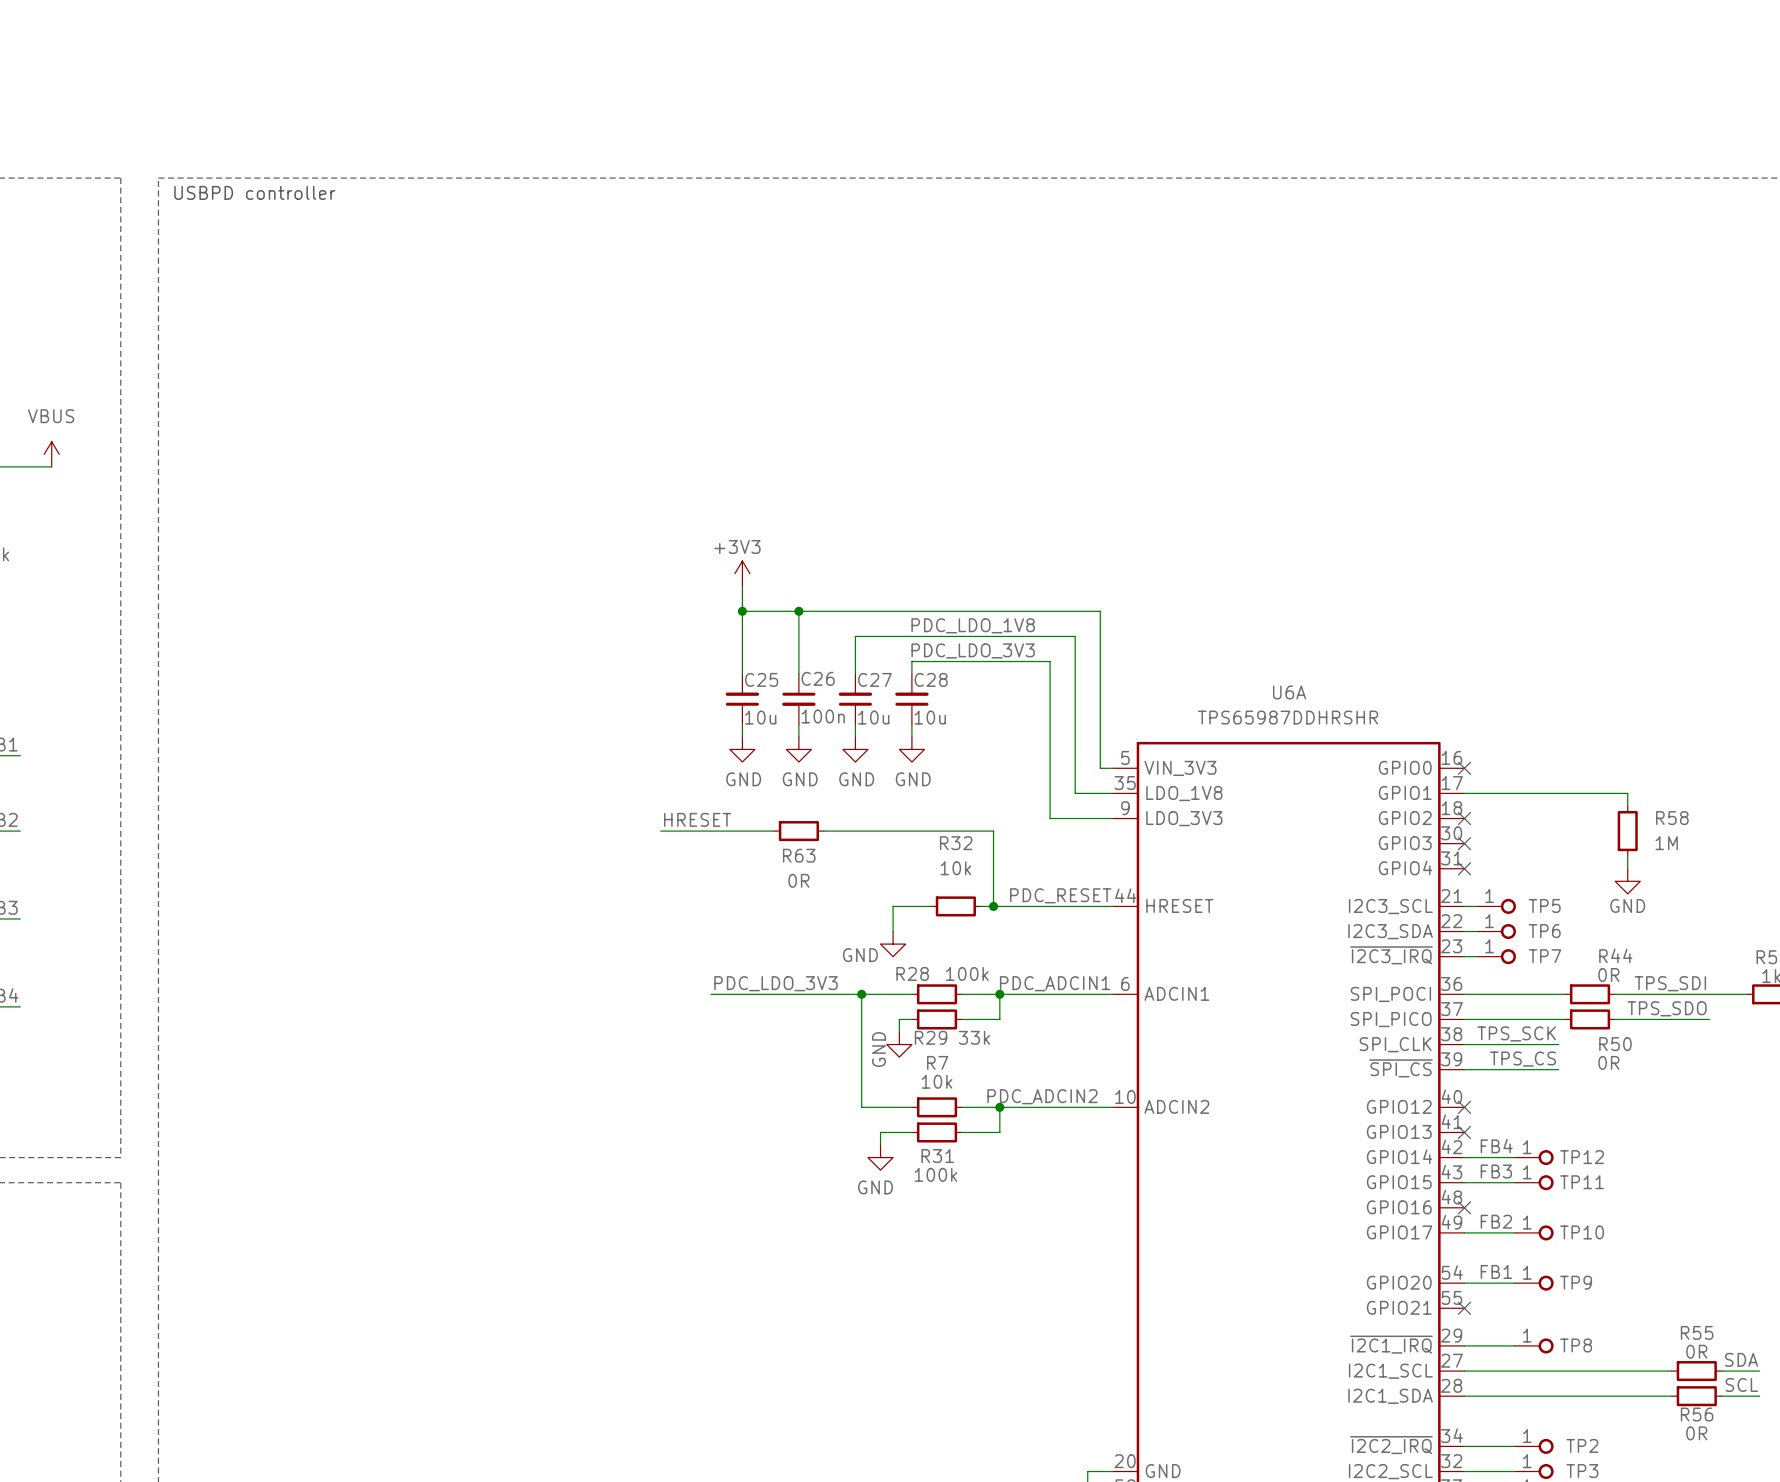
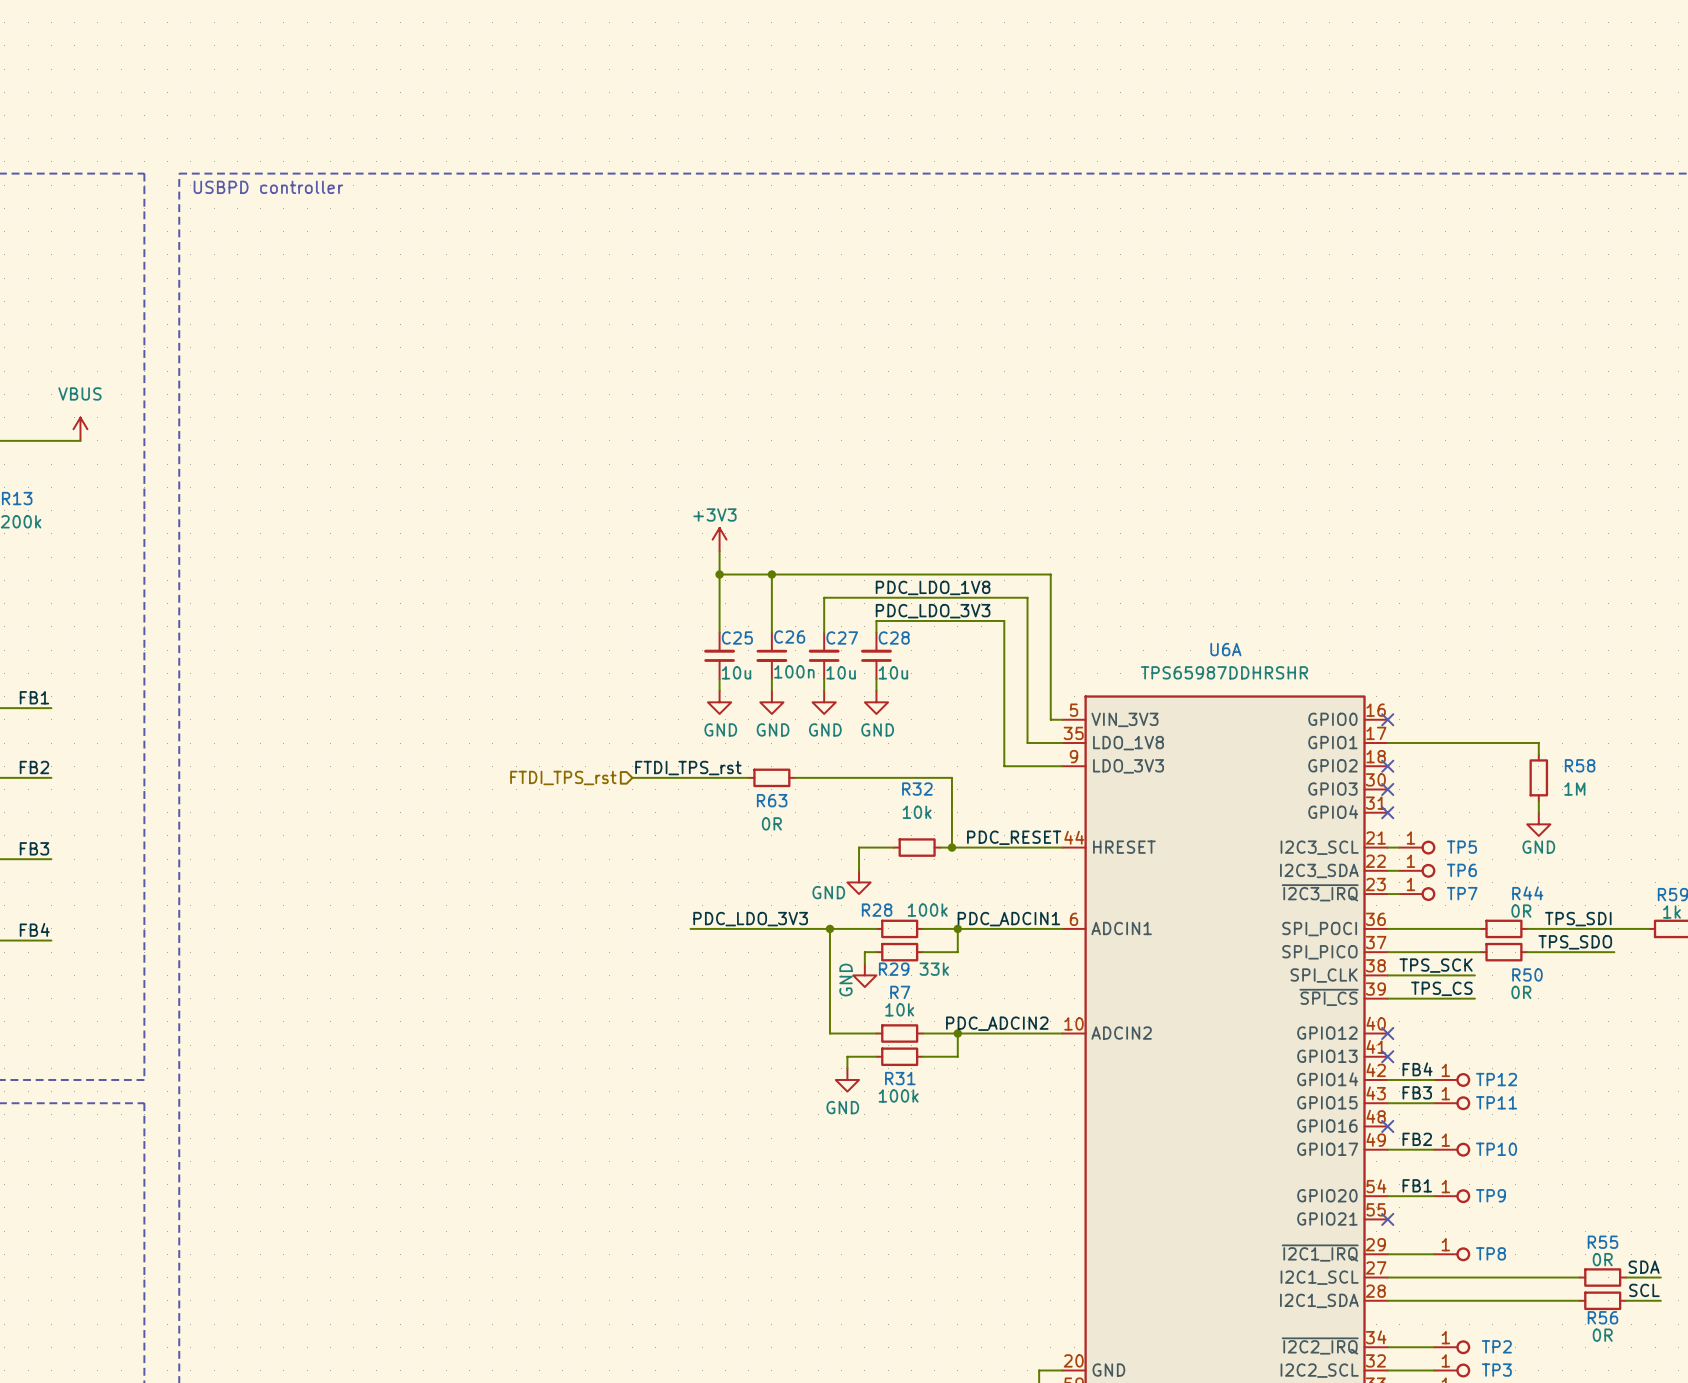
label: HRESET (697, 819) -> none
label: none -> FTDI_TPS_rst (688, 768)
hierarchical label: none -> FTDI_TPS_rst (563, 777)
wire: none -> (632, 777) (644, 777)

